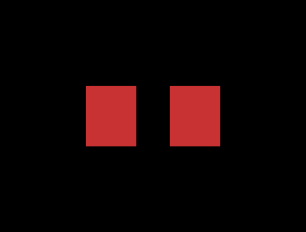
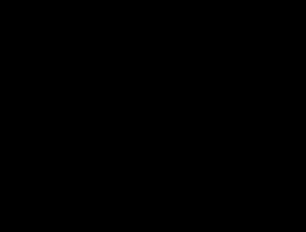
part: (153, 116) -> none

